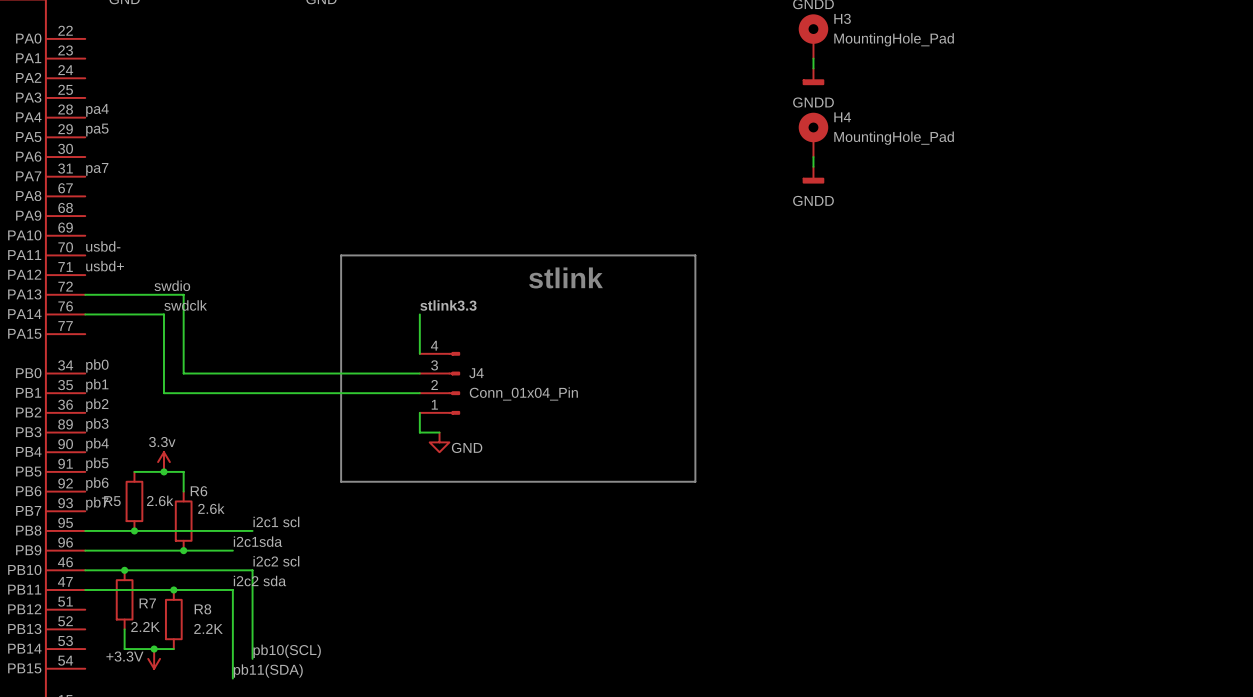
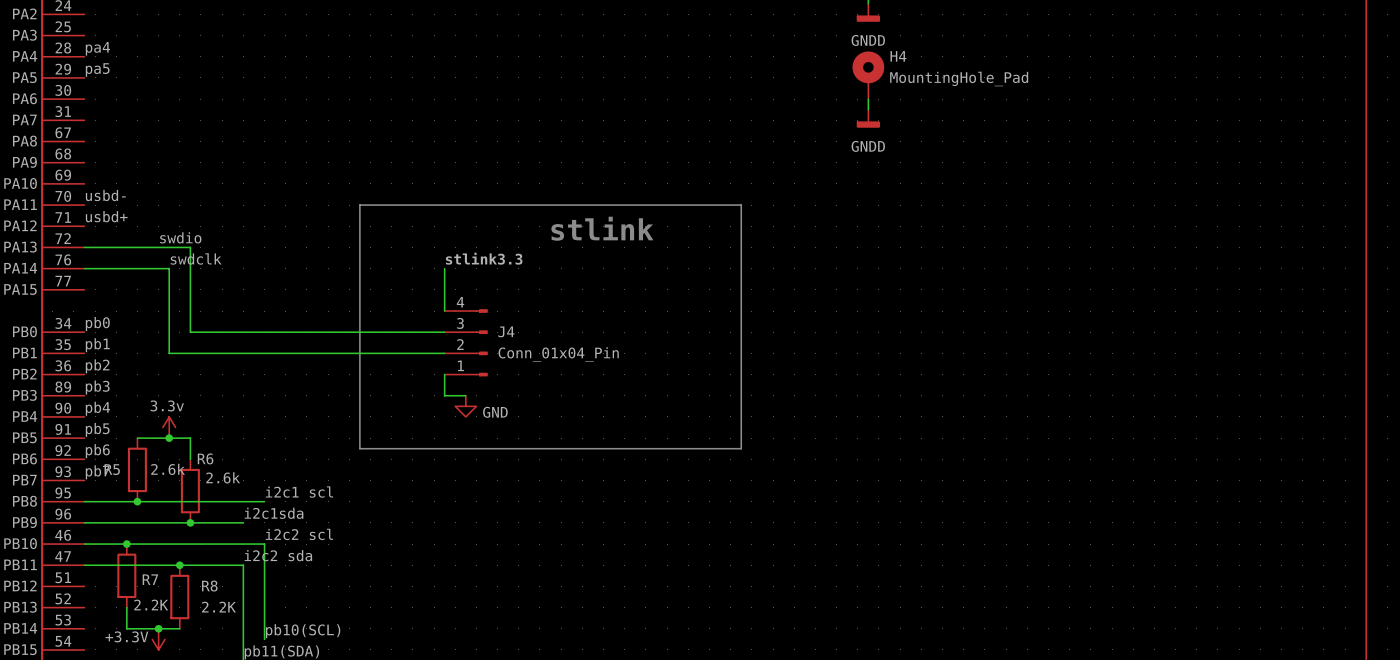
label: pa7 (97, 169) -> none

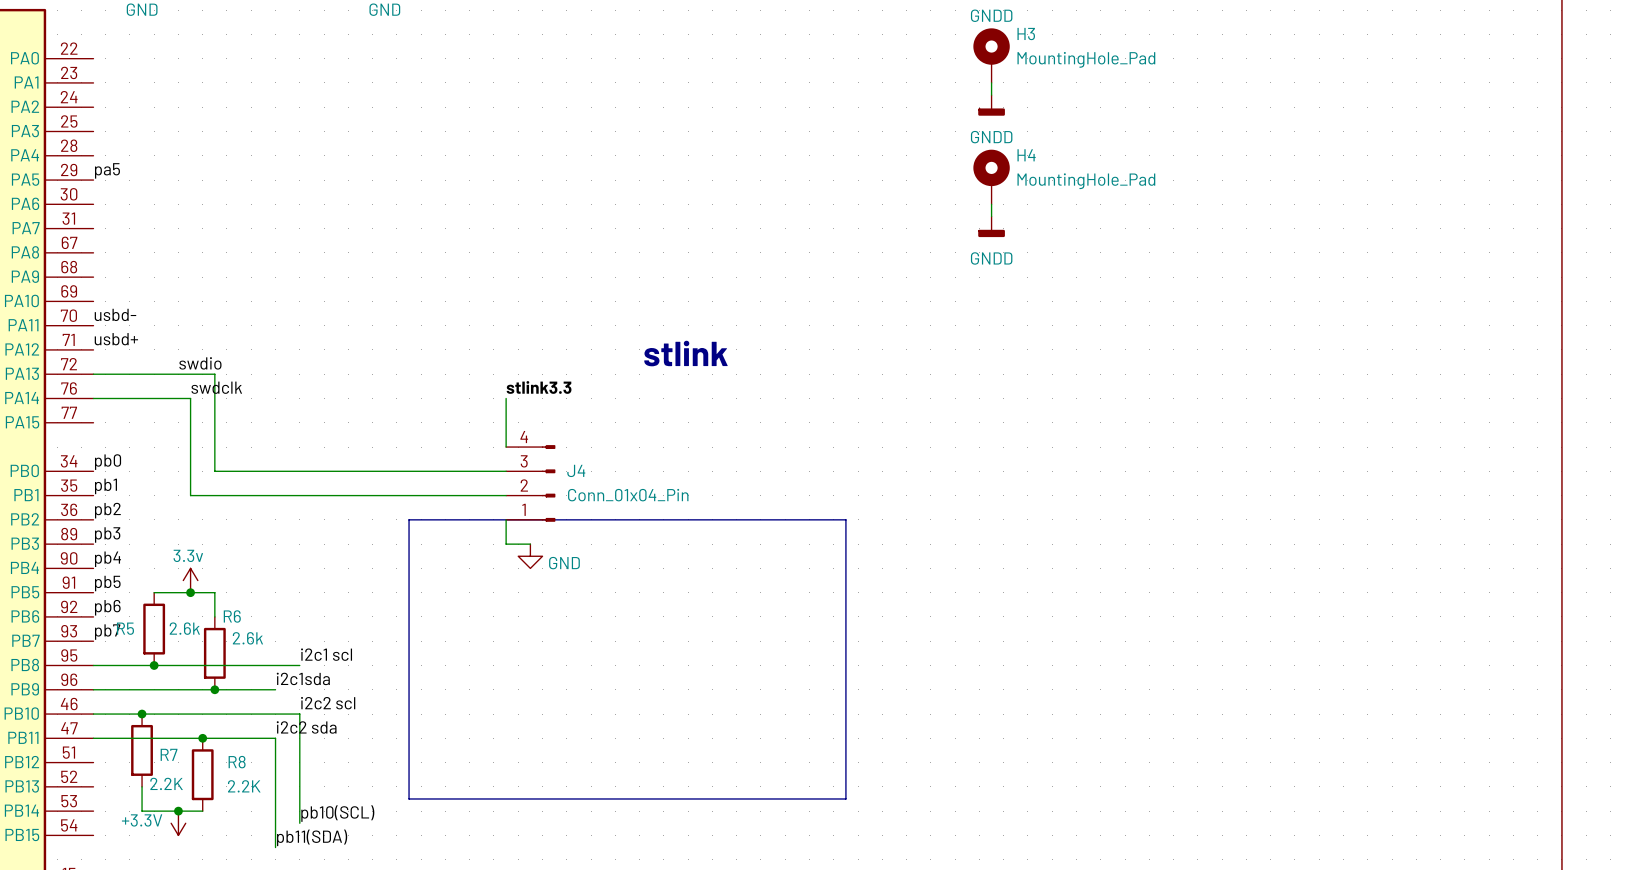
label: pa4 (97, 48) -> none
line: (359, 374) (359, 205) (741, 205) (741, 374) -> (409, 519) (845, 519)
line: (359, 448) (741, 448) -> (409, 604) (409, 798) (845, 798) (845, 604)

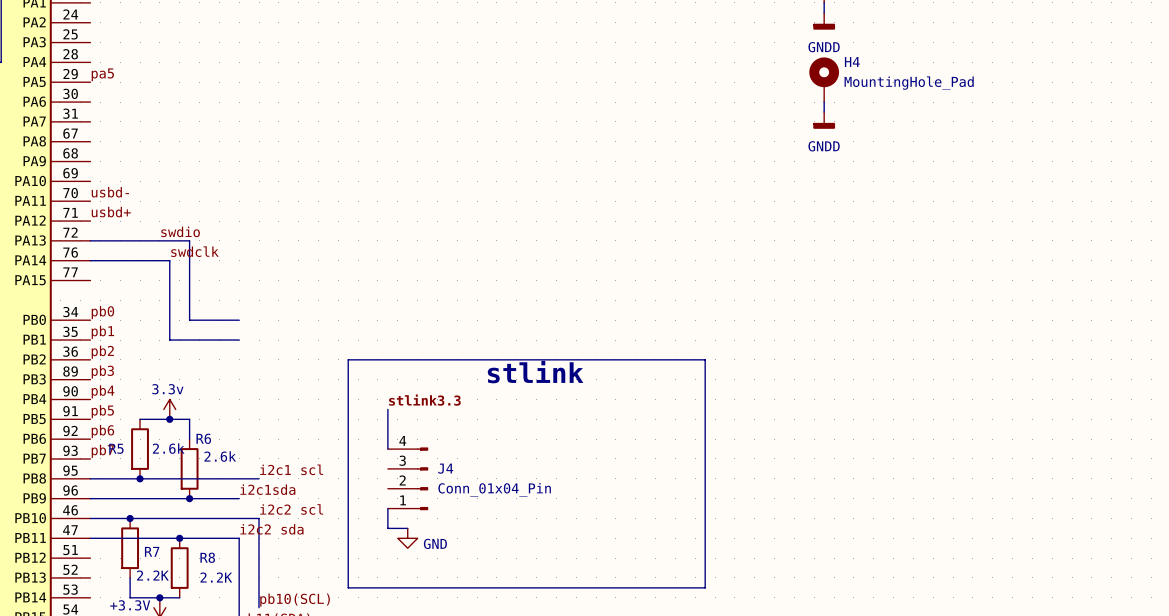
text position: stlink (685, 353) -> stlink (535, 372)
label position: stlink3.3 (539, 387) -> stlink3.3 (424, 400)
wire: (506, 398) (506, 447) -> (387, 409) (387, 449)
wire: (275, 471) (506, 471) -> none
J4 position: (530, 483) -> (408, 478)
wire: (275, 495) (506, 495) -> none
wire: (506, 519) (506, 544) (530, 544) -> (387, 508) (387, 528) (407, 528)
power symbol position: GND (530, 556) -> GND (407, 538)

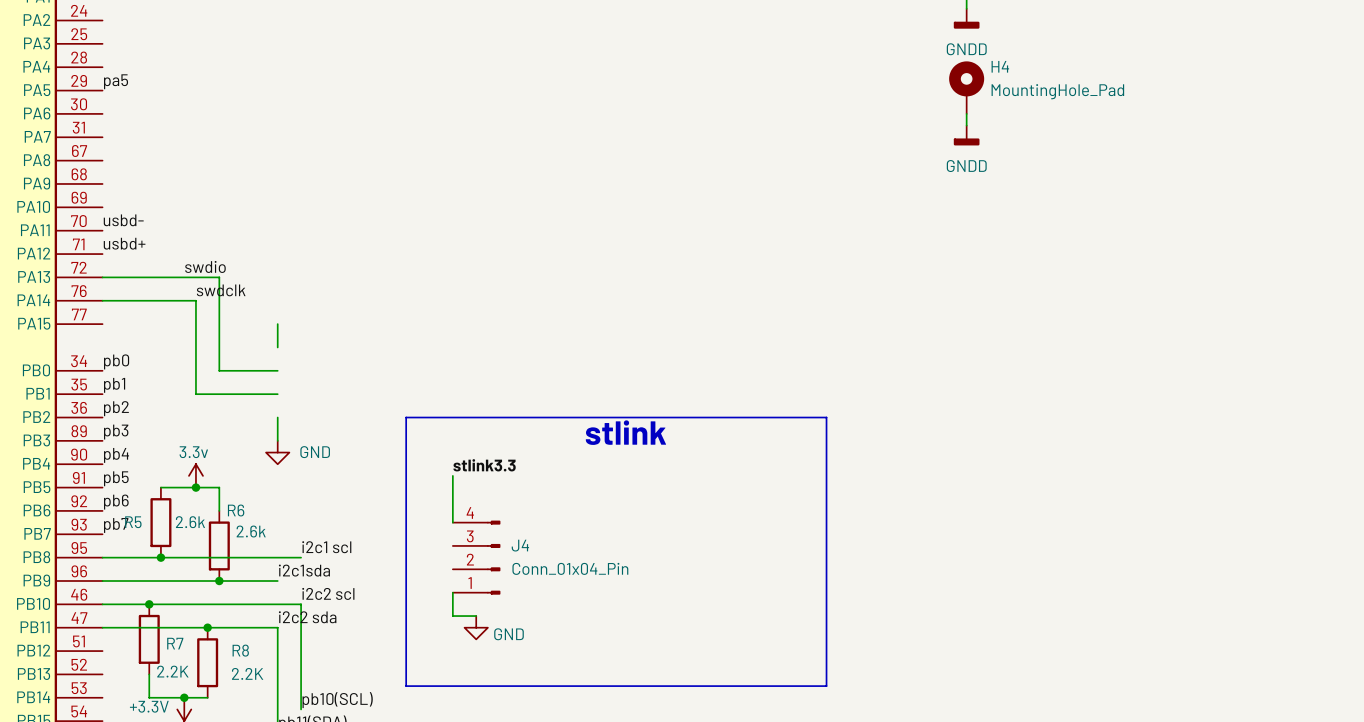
wire: none -> (277, 324) (277, 347)
wire: none -> (277, 417) (277, 440)
power symbol: none -> GND (277, 452)

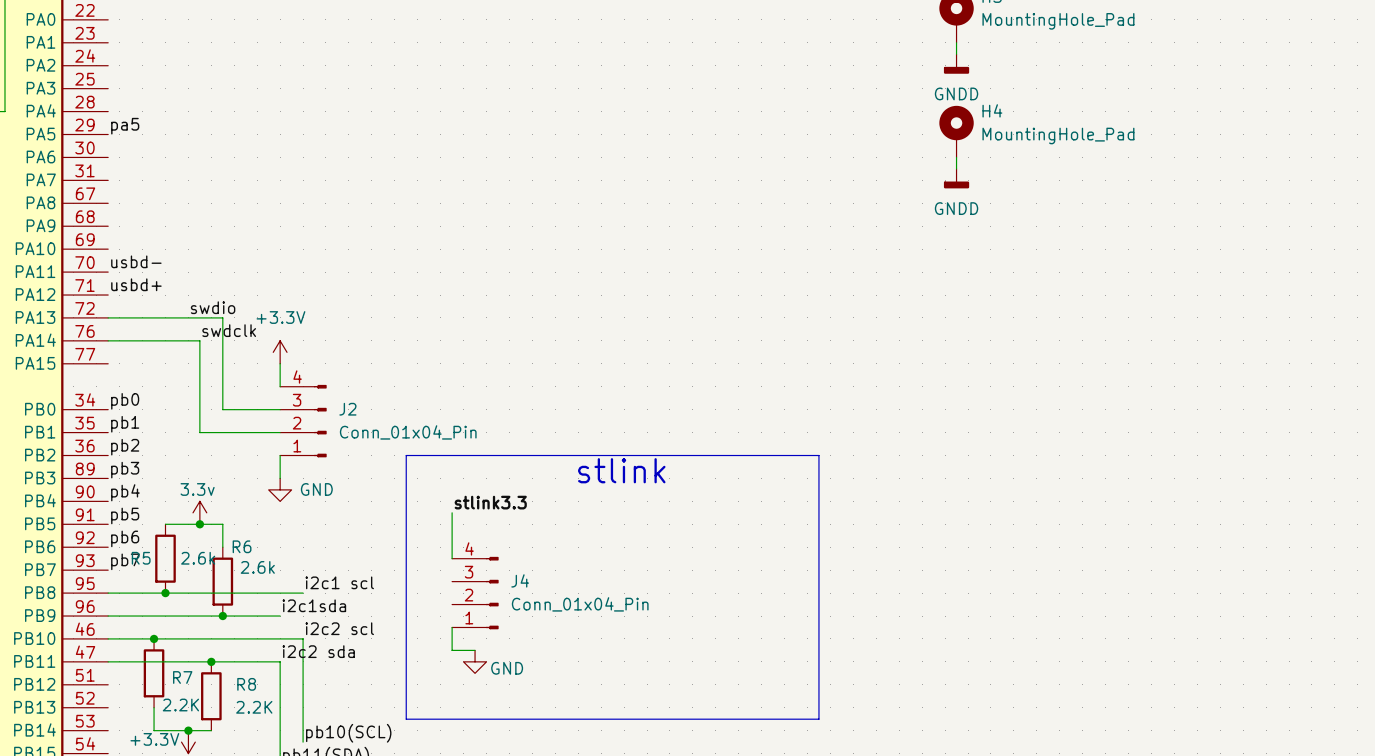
power symbol: none -> +3.3V (280, 352)
J2: none -> Conn_01x04_Pin (303, 421)

